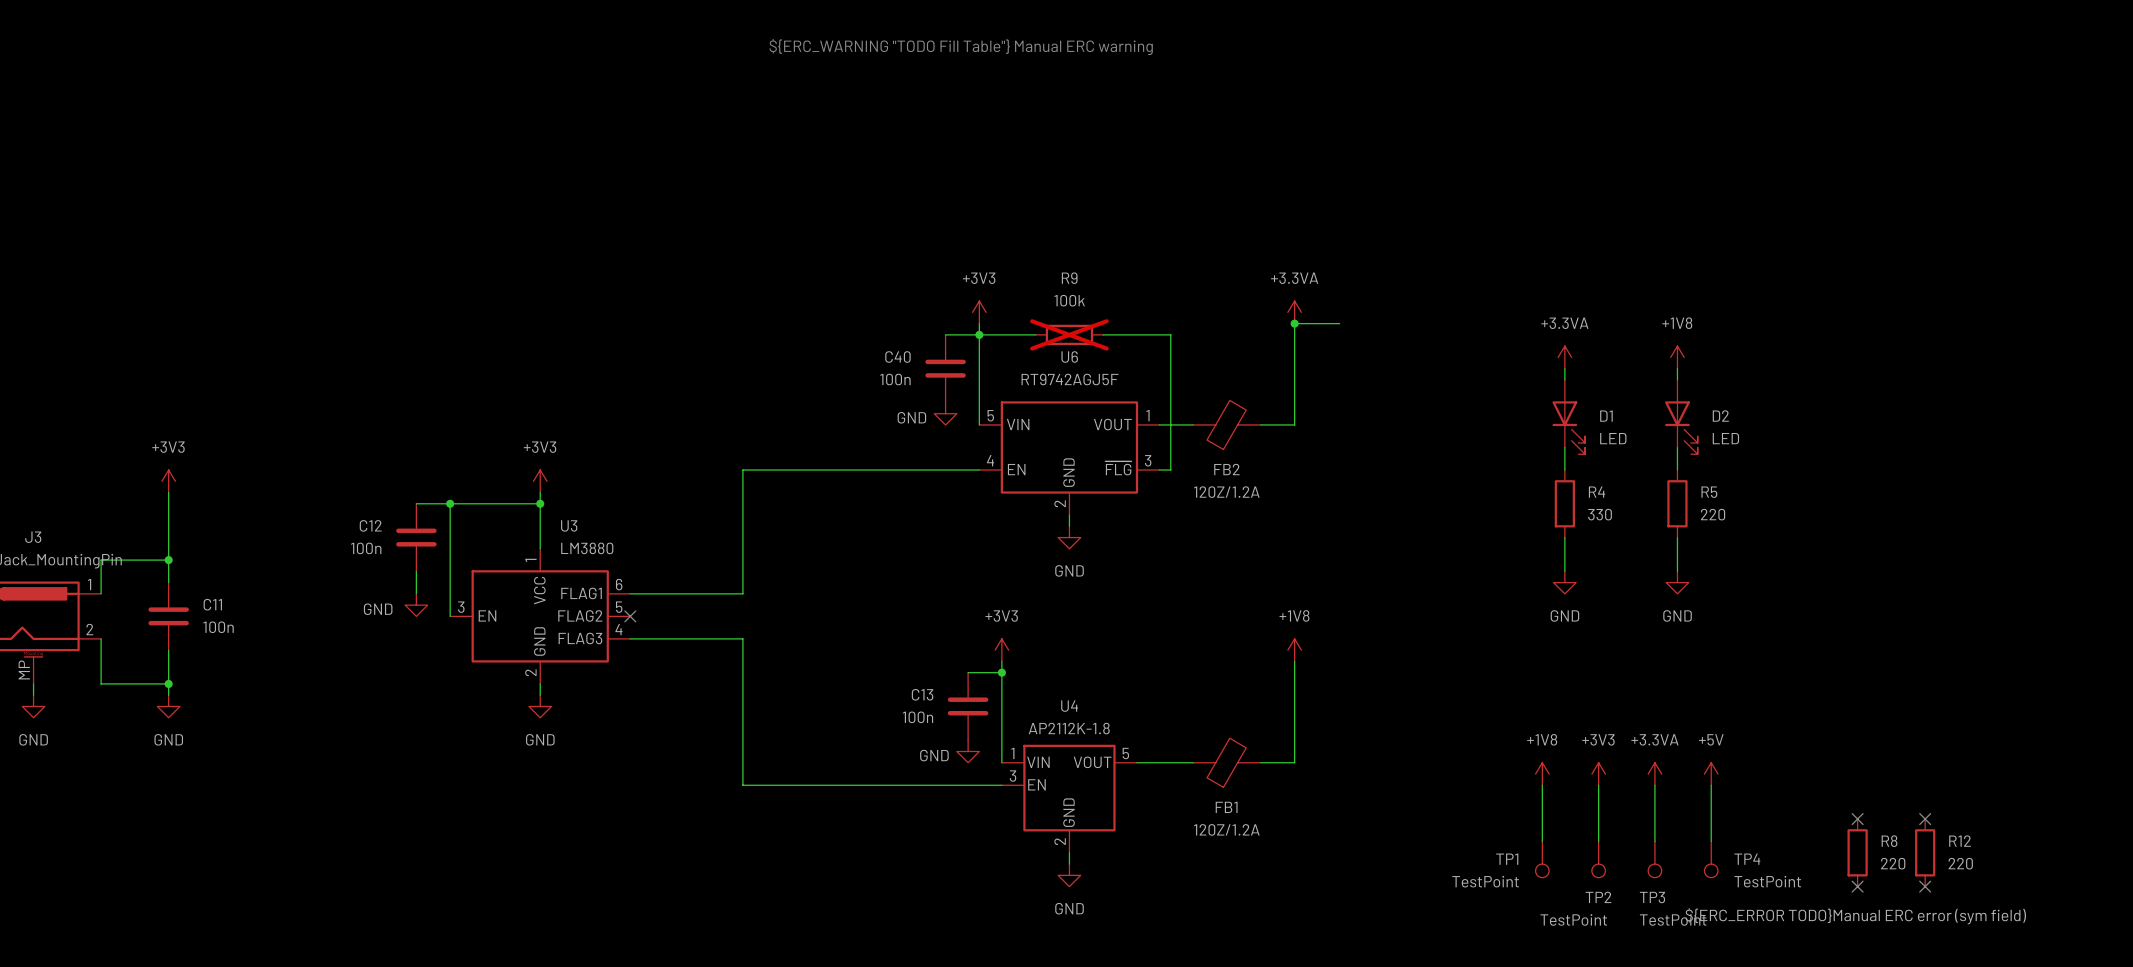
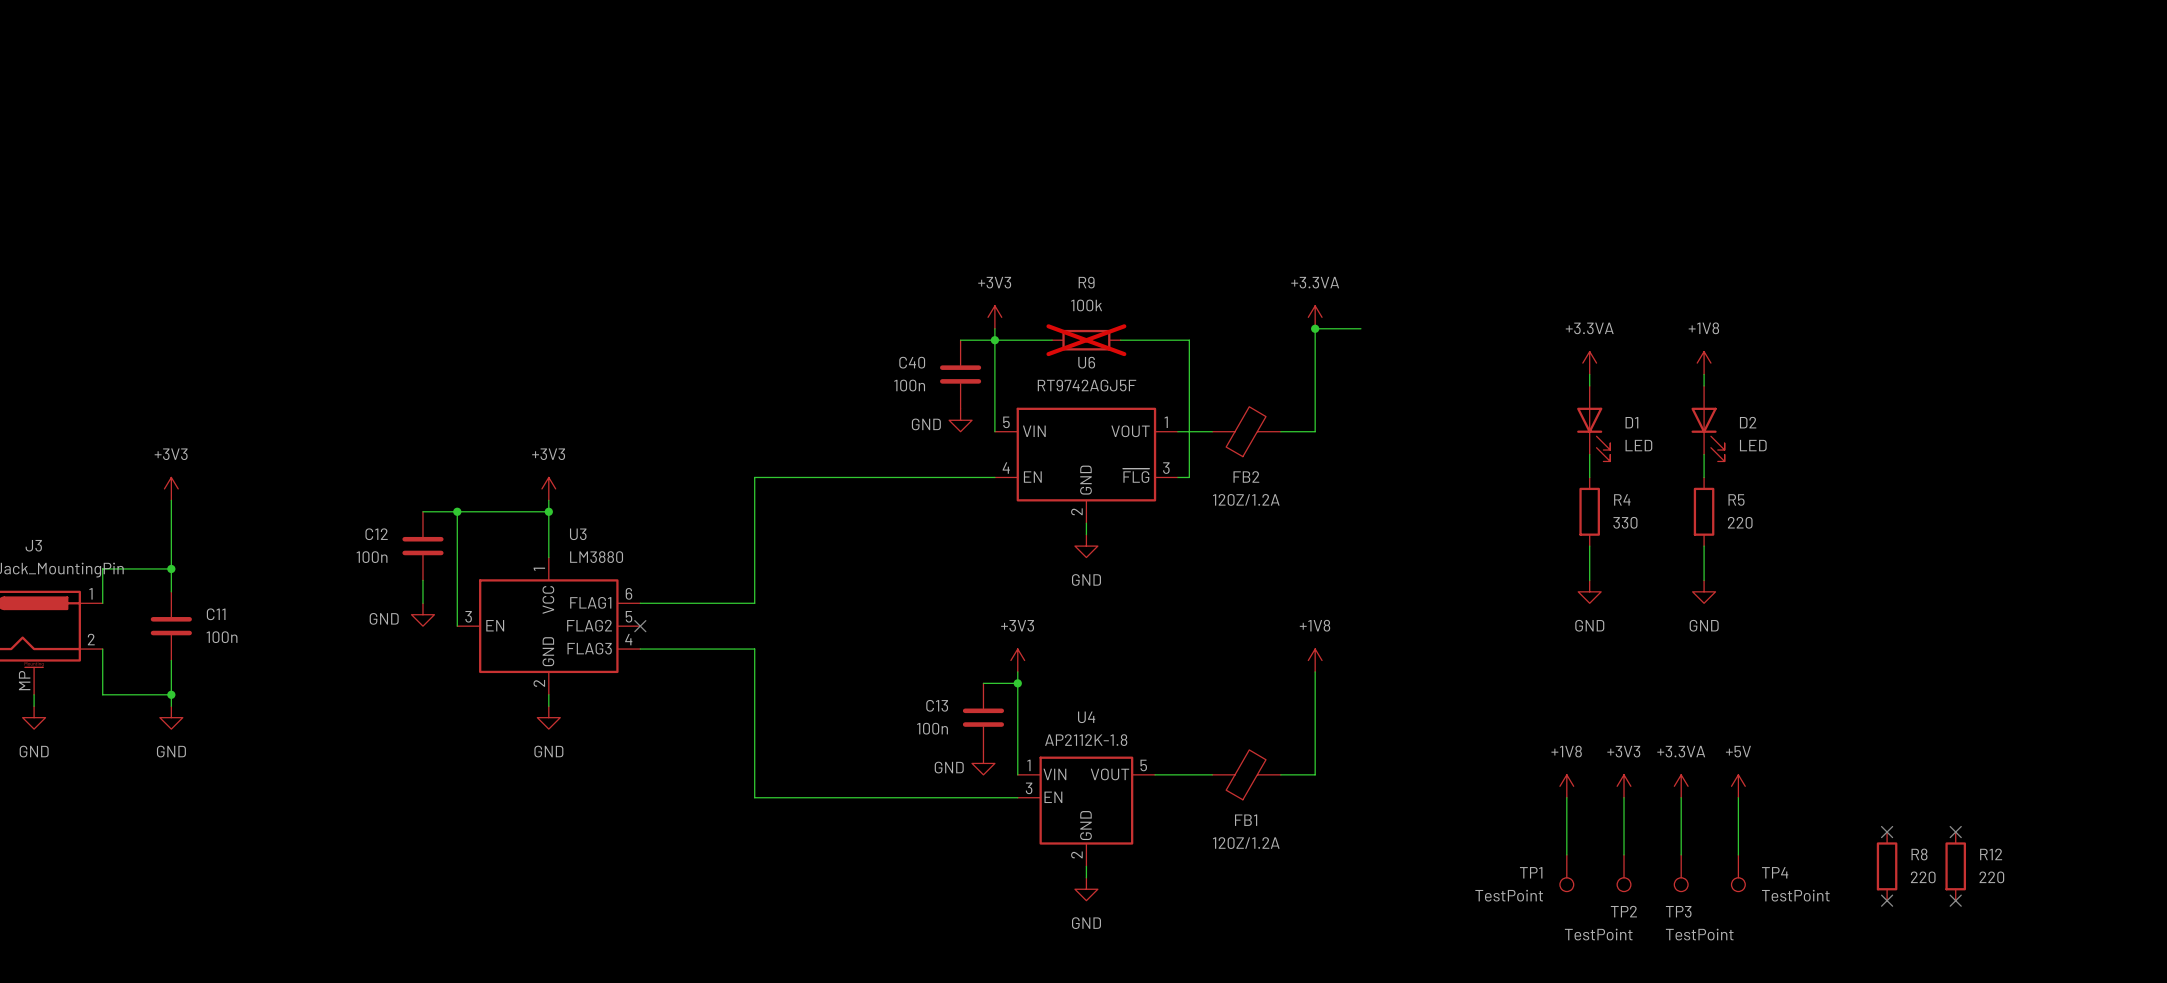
text: ${ERC_WARNING "TODO Fill Table"} Manual ERC warning (961, 47) -> none
R8 text: ${ERC_ERROR TODO}Manual ERC error (sym field) (1855, 916) -> none

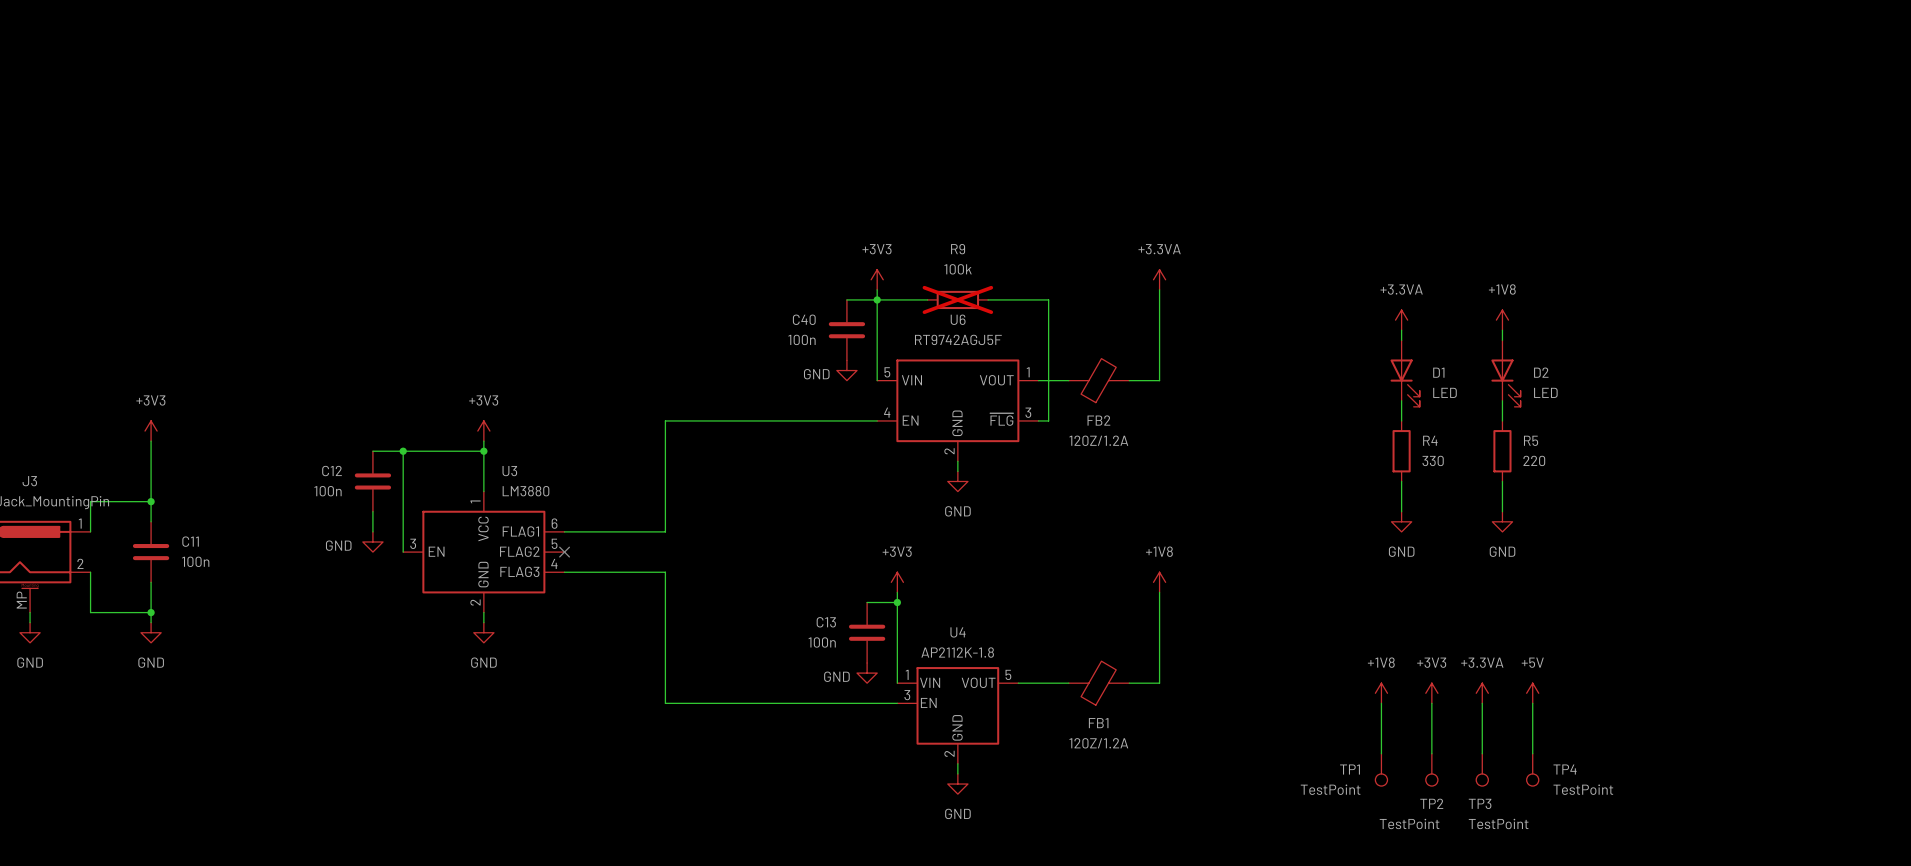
wire: (1315, 328) (1360, 328) -> none
junction: (1315, 328) -> none
no-connect mark: (1887, 832) -> none
no-connect mark: (1955, 832) -> none
R8: 220 (1887, 866) -> none
R12: 220 (1955, 866) -> none
no-connect mark: (1887, 900) -> none
no-connect mark: (1955, 900) -> none

